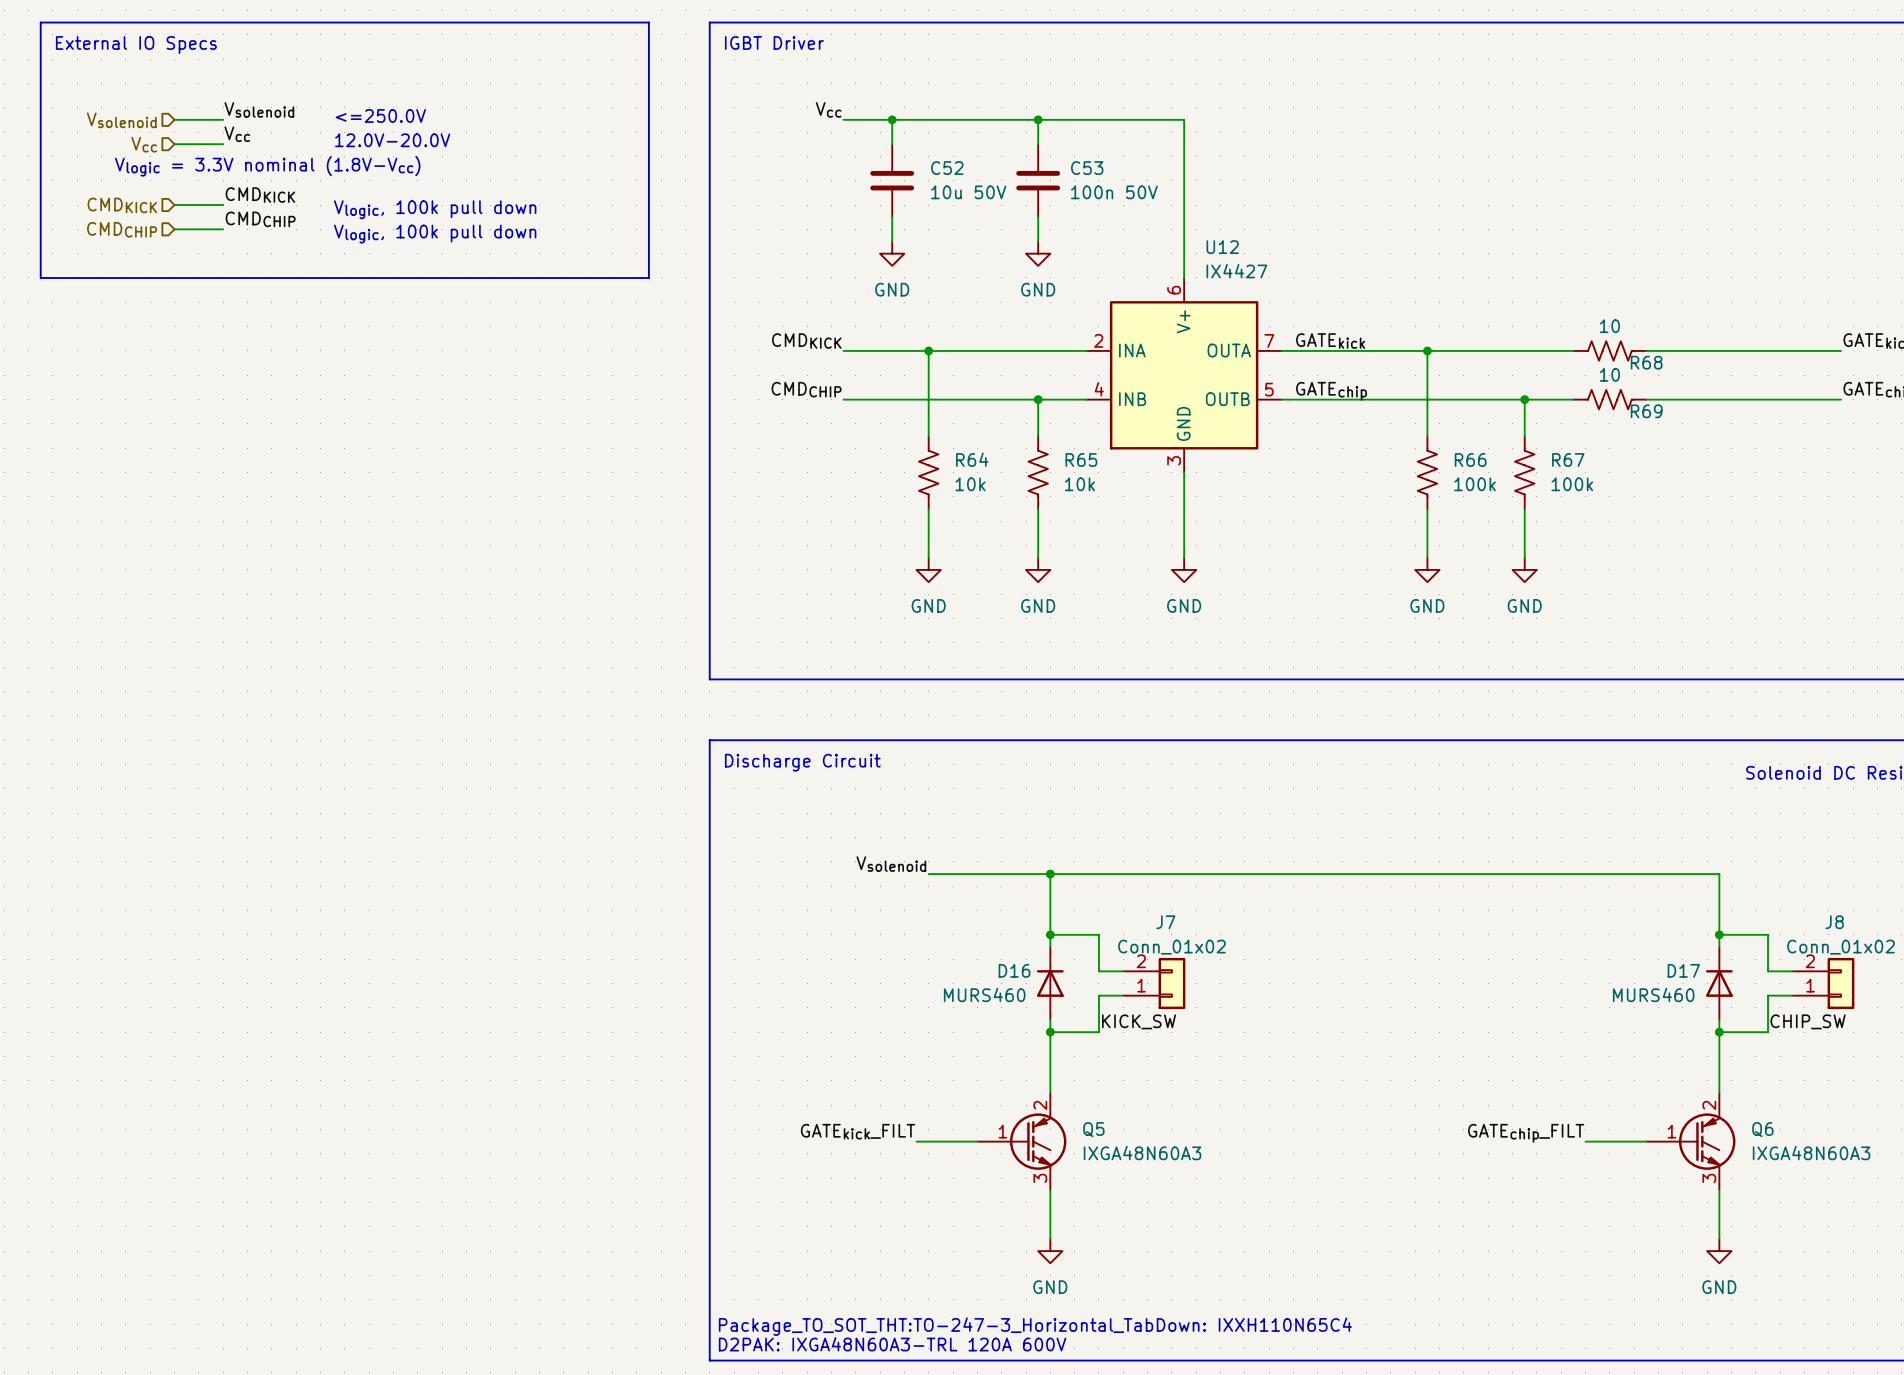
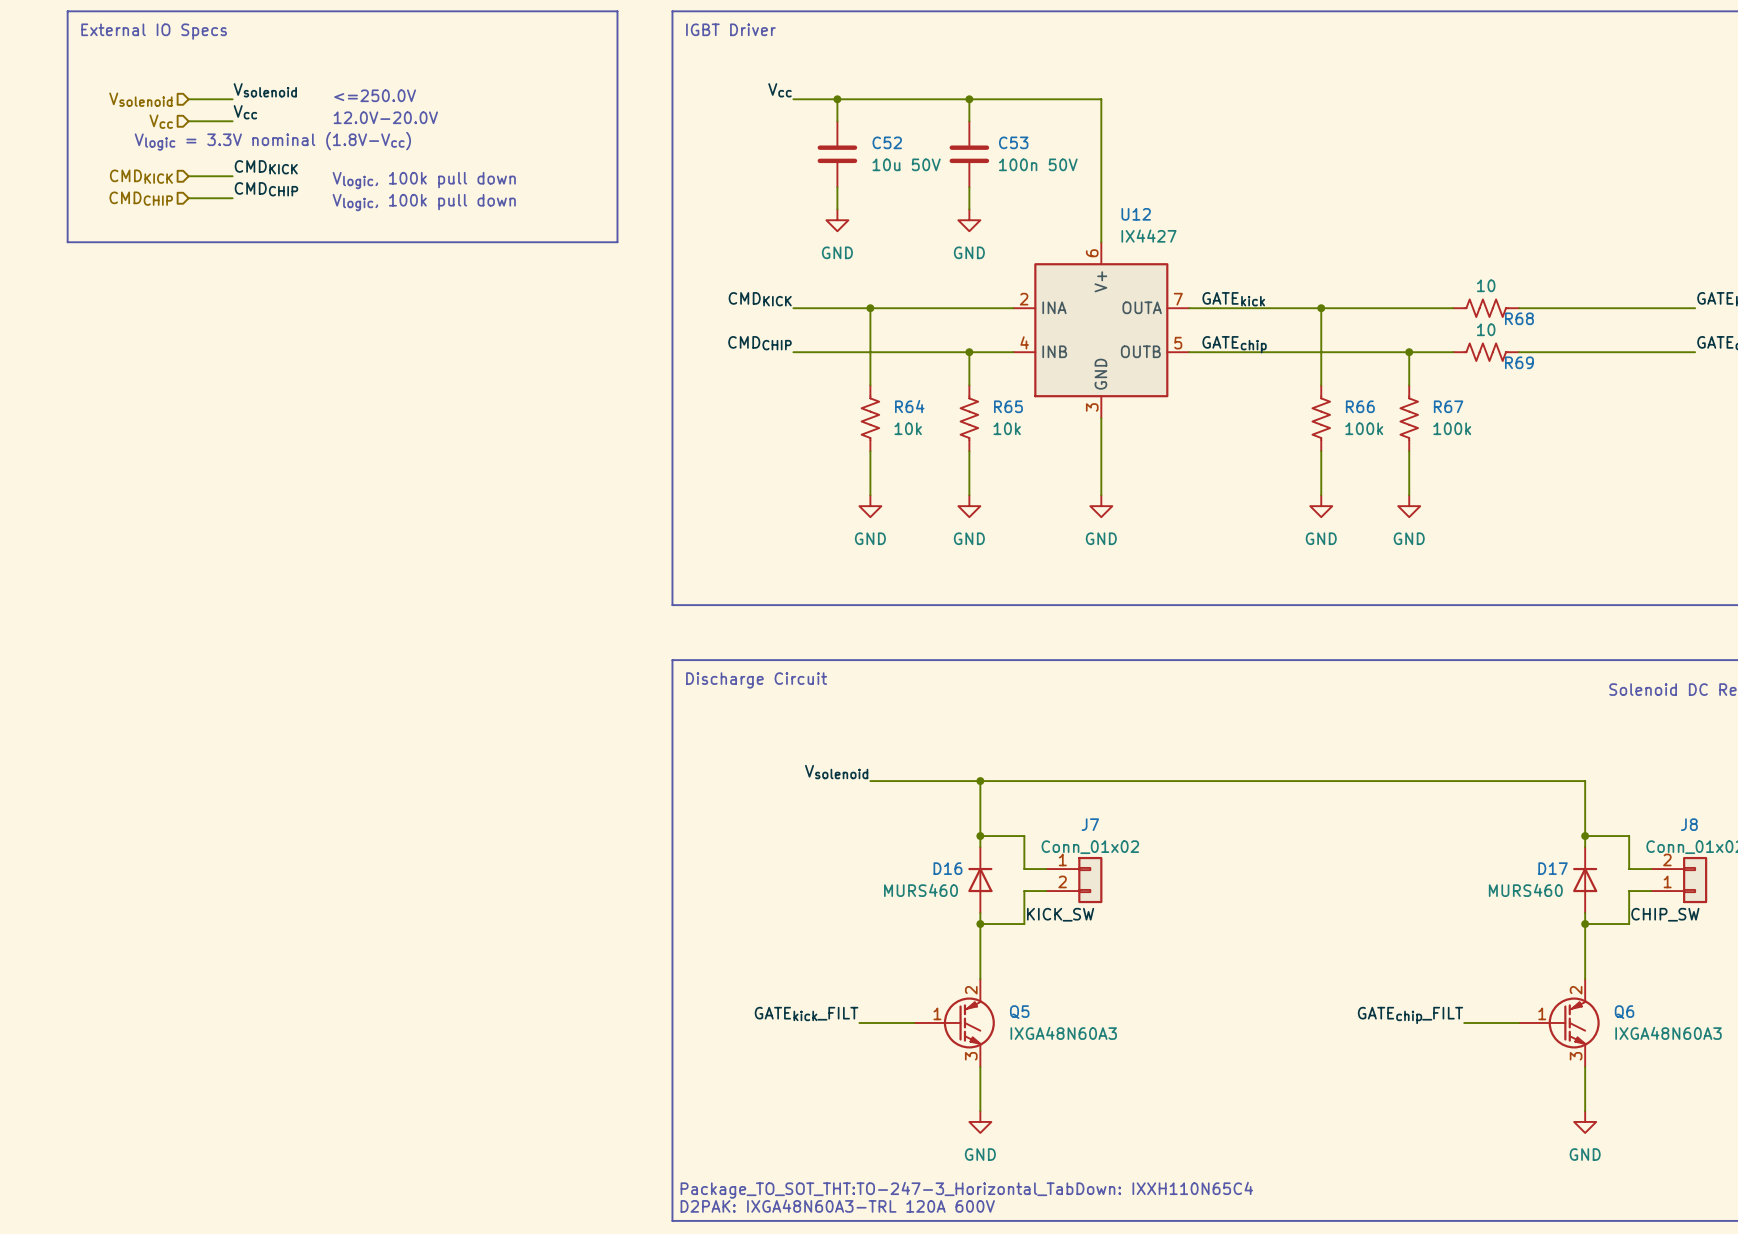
J7 flip: as is (1171, 983) -> up-down (1090, 880)

